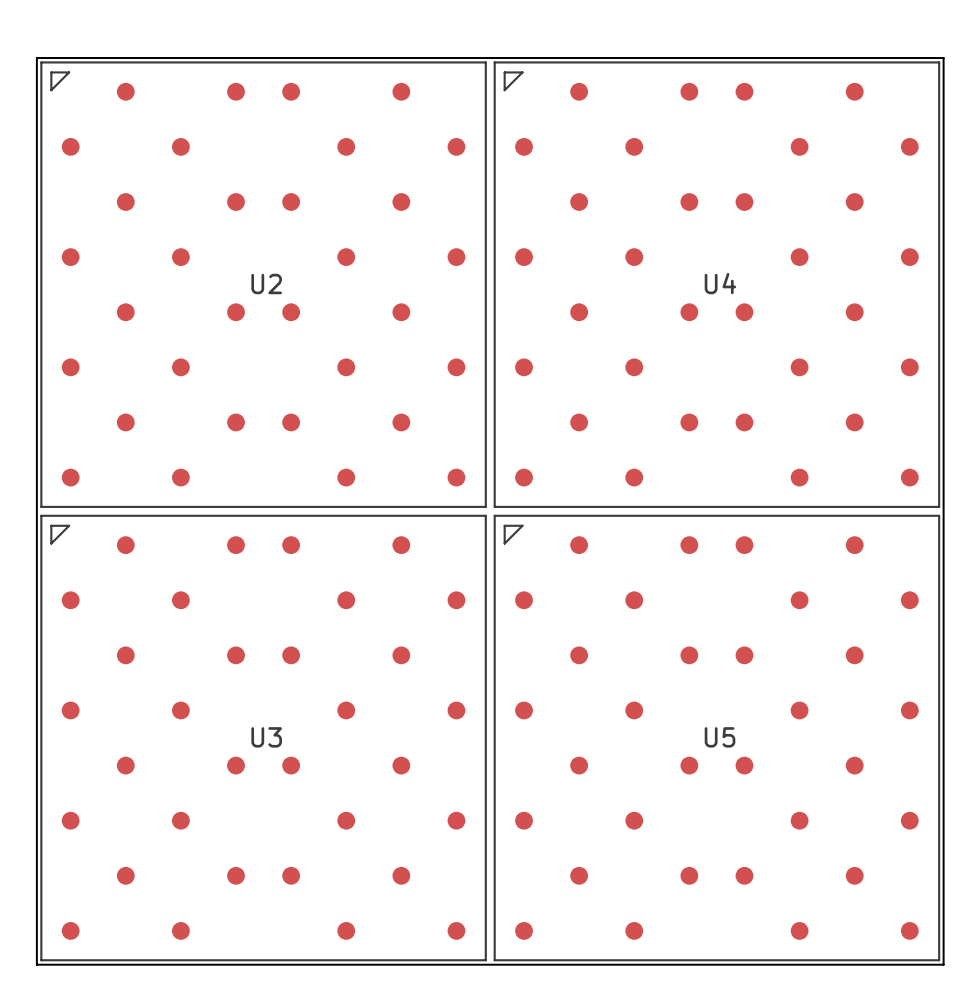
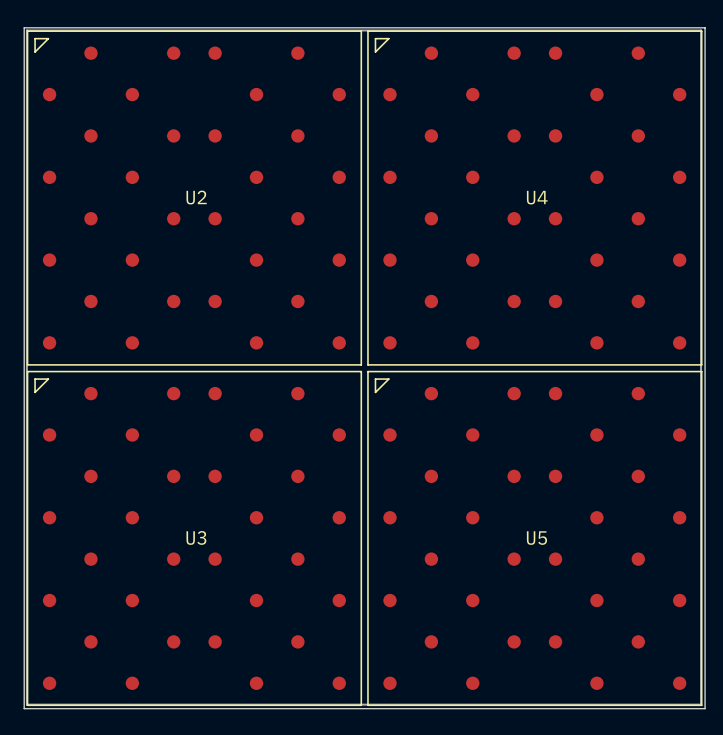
line: none -> (26, 30) (26, 704) (701, 704) (701, 30) (26, 30)

